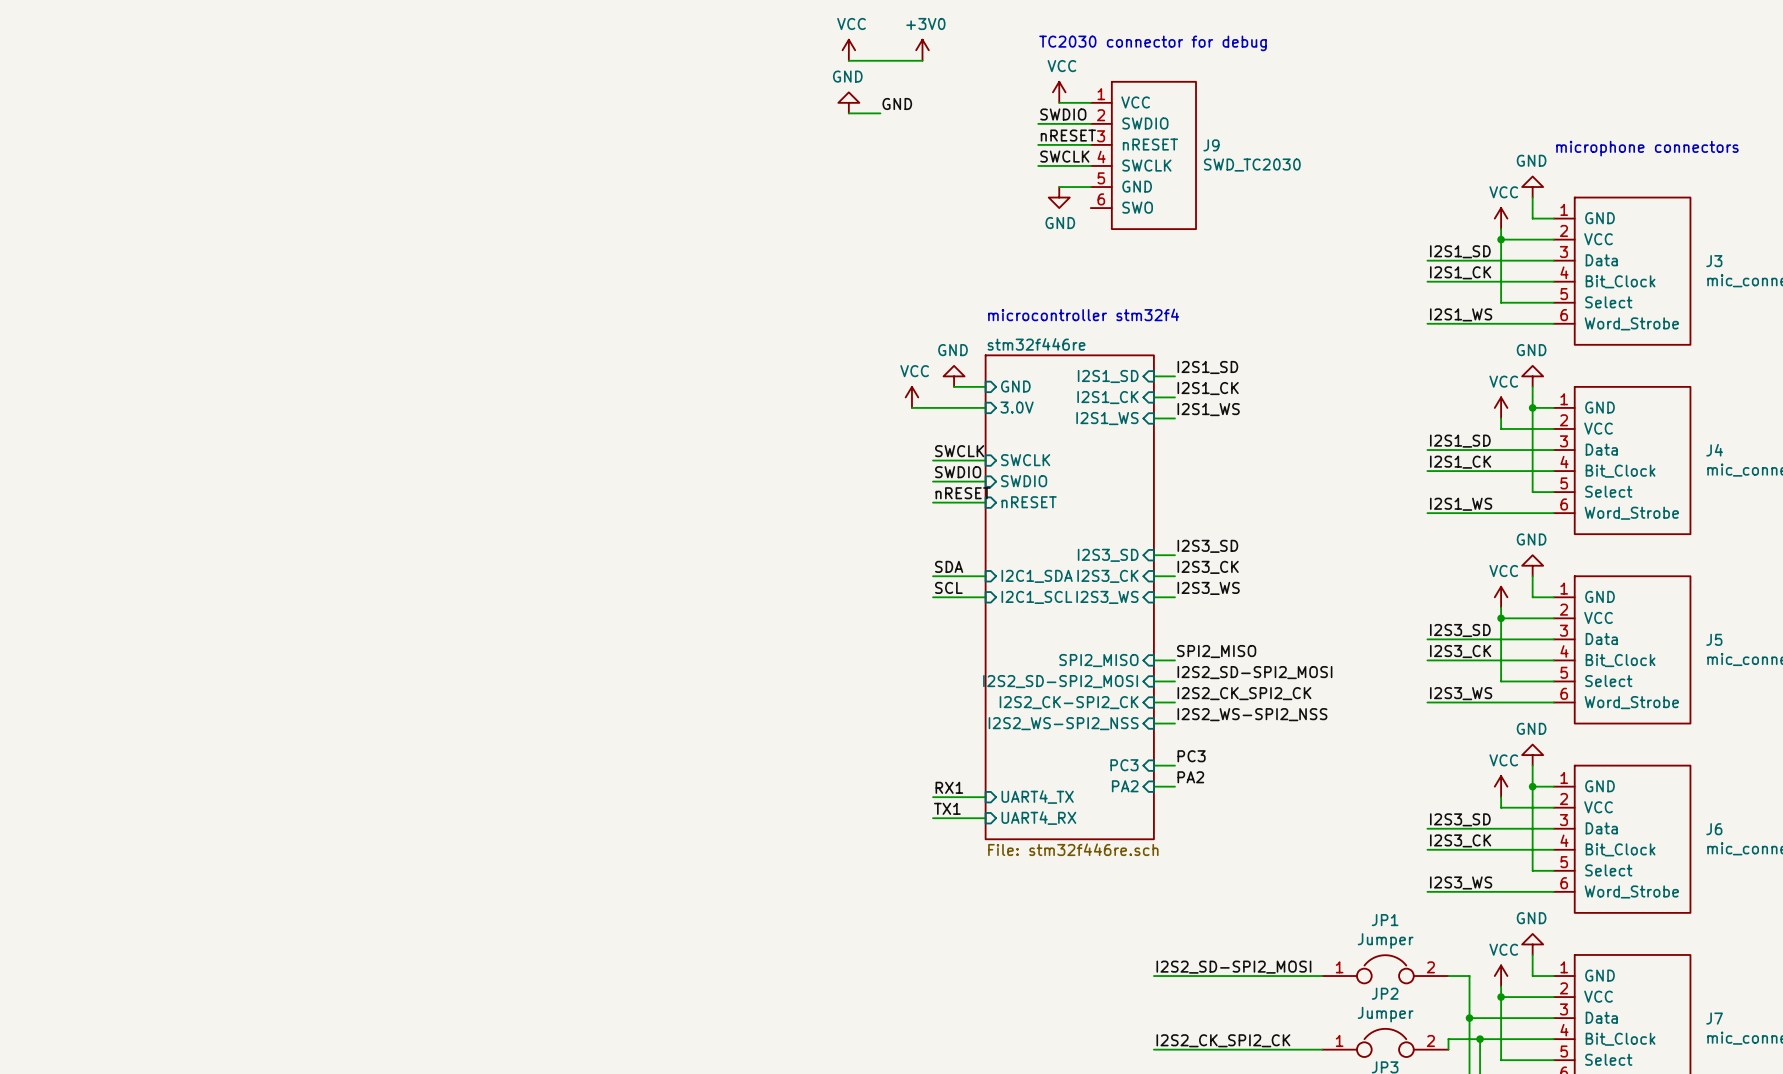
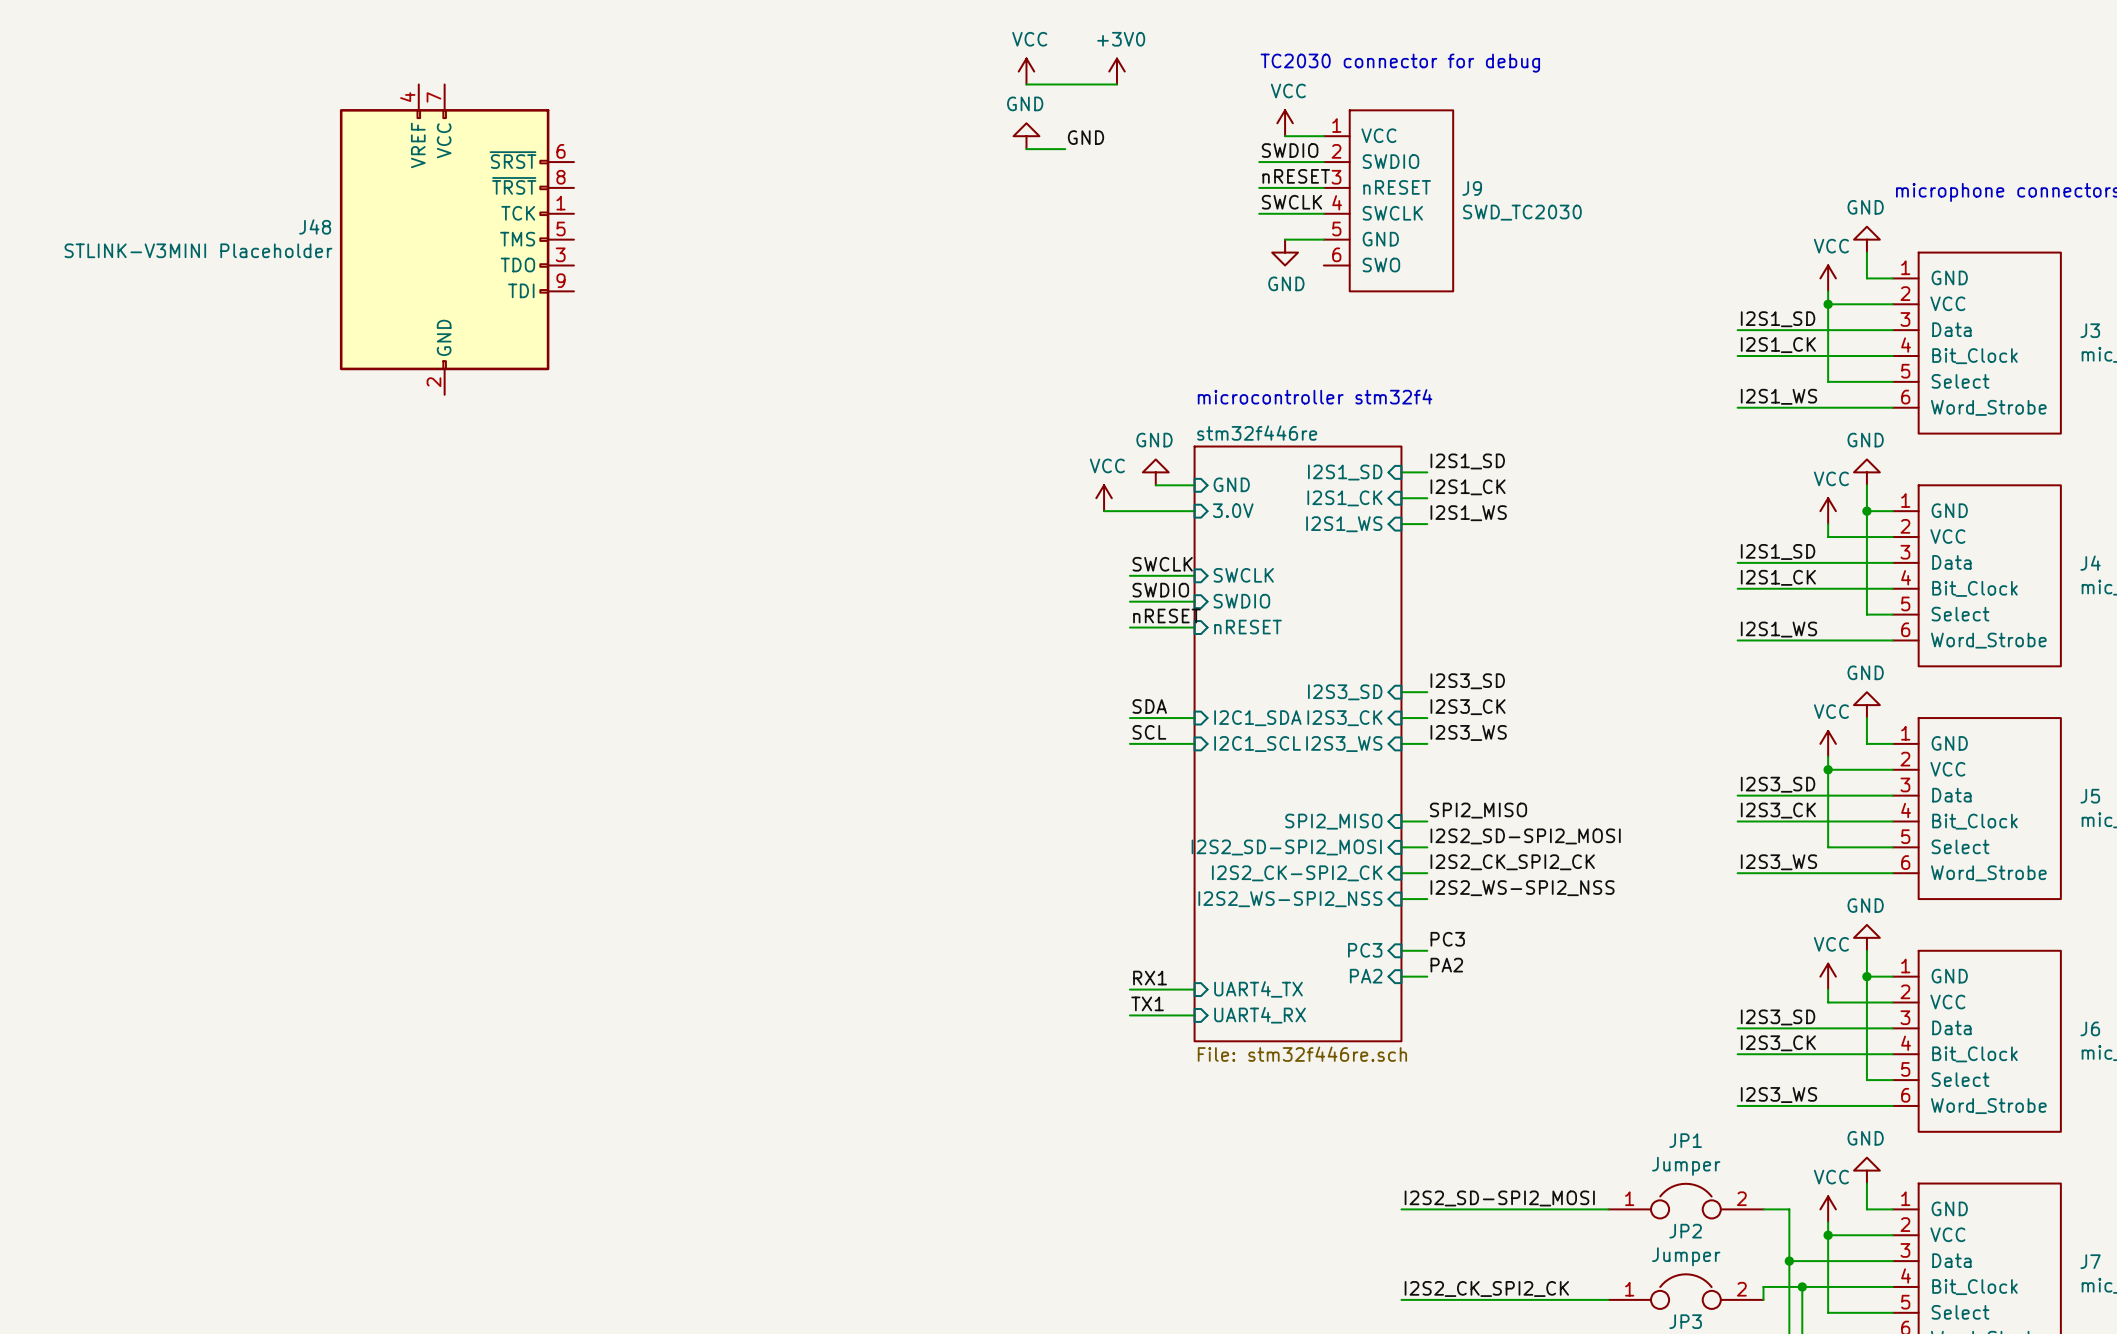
J48: none -> STLINK-V3MINI Placeholder (456, 239)

